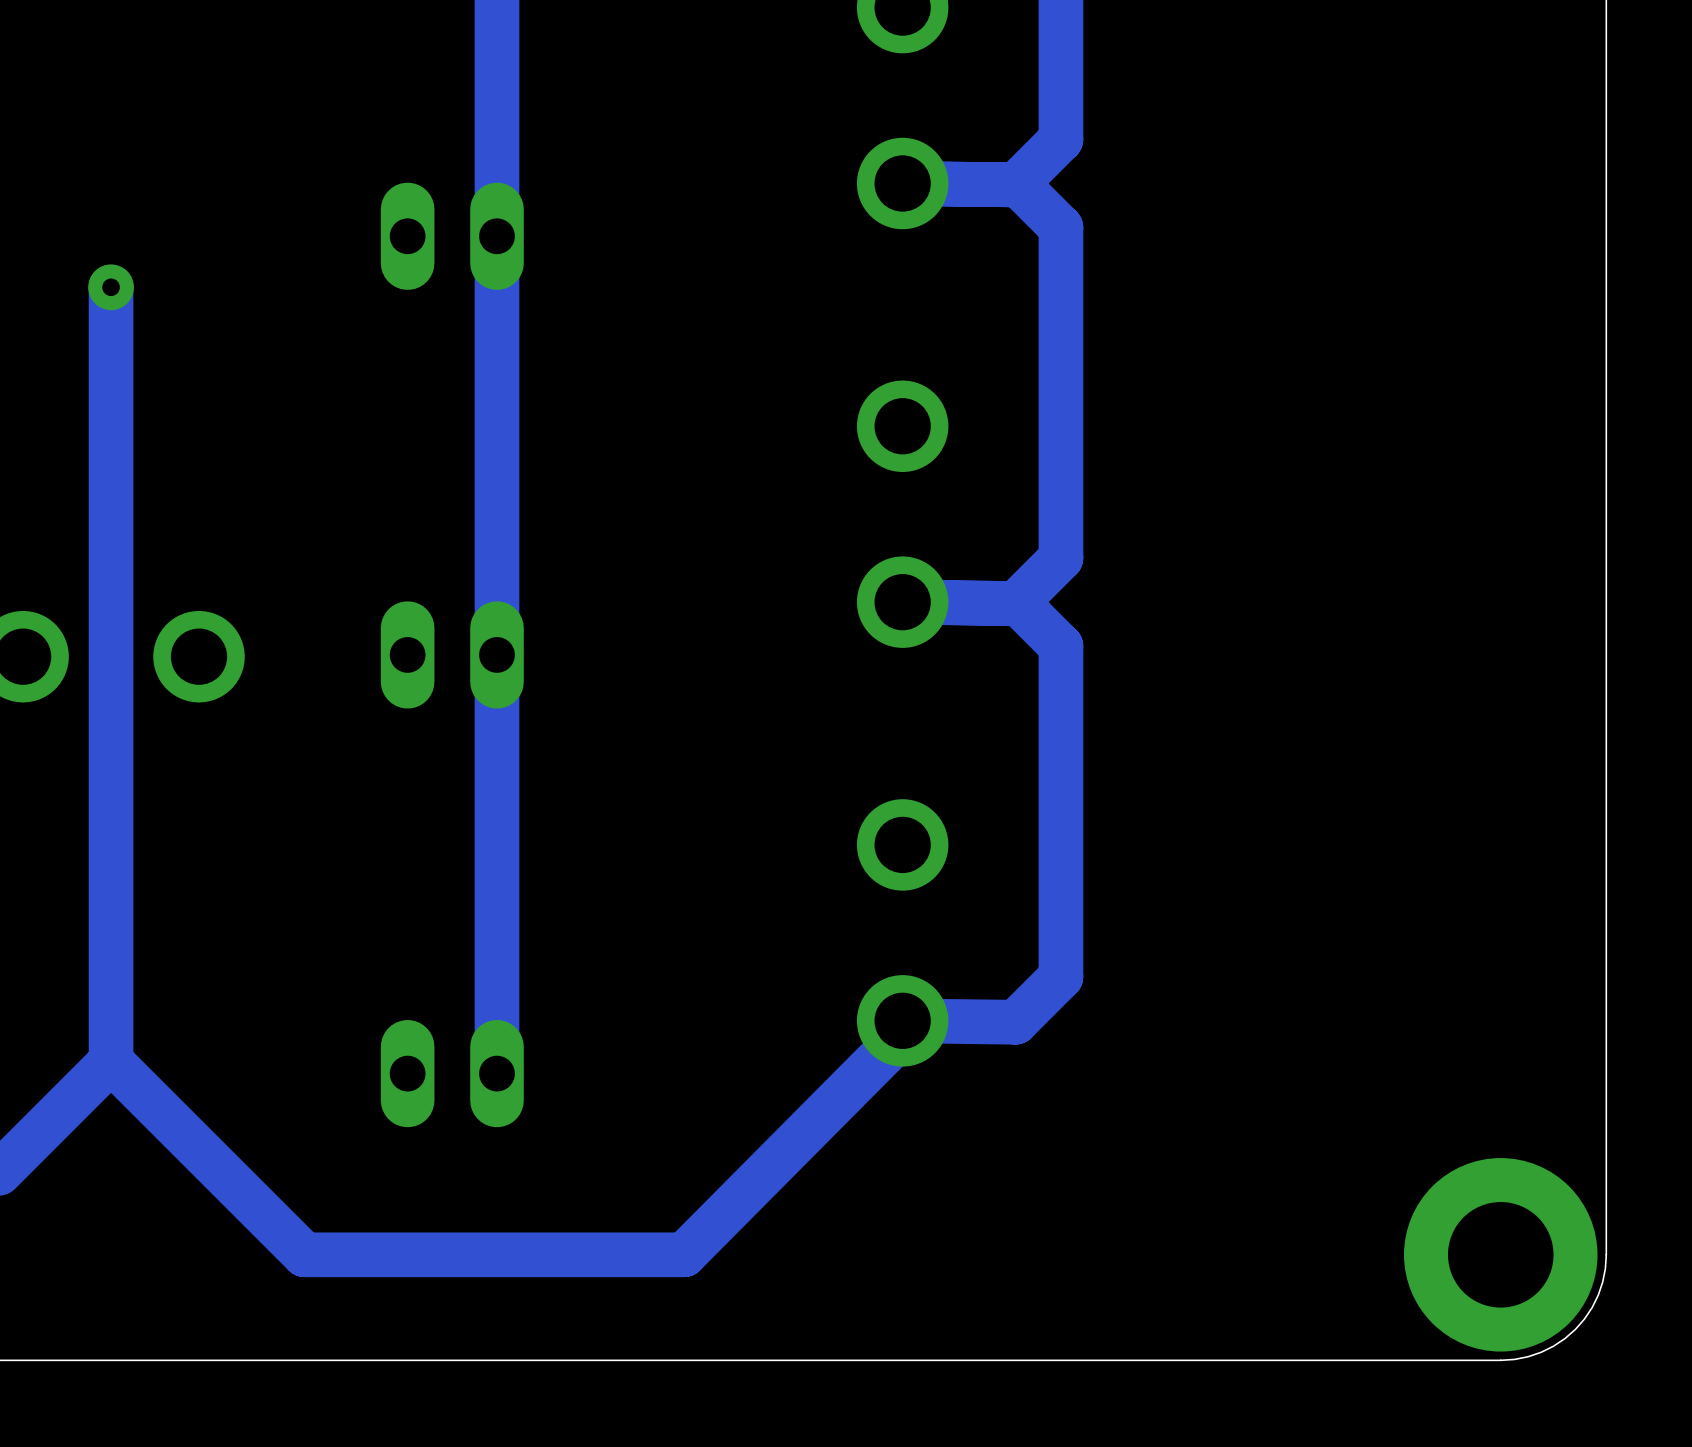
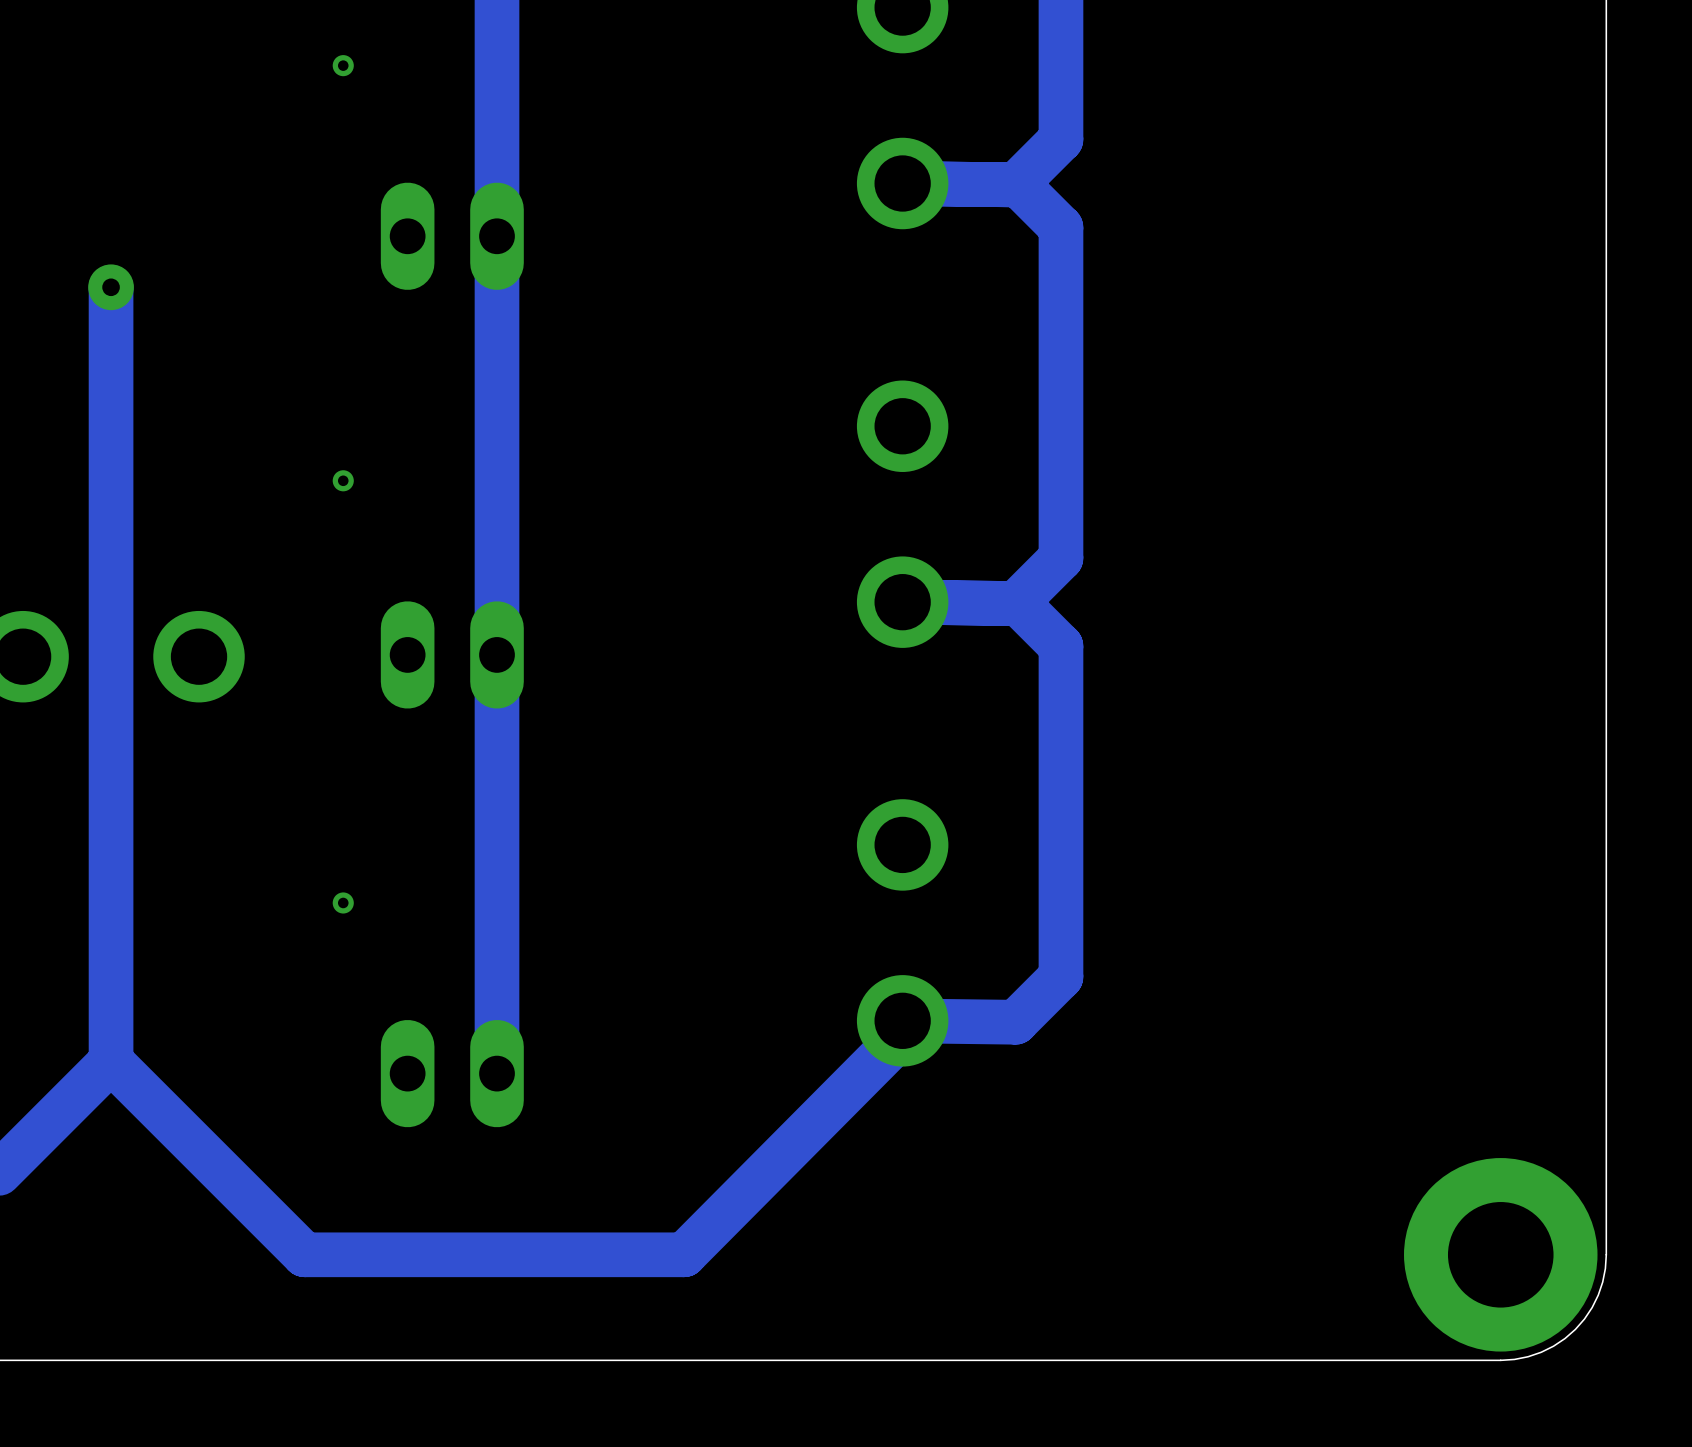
via: none -> (343, 65)
via: none -> (343, 480)
via: none -> (343, 902)

